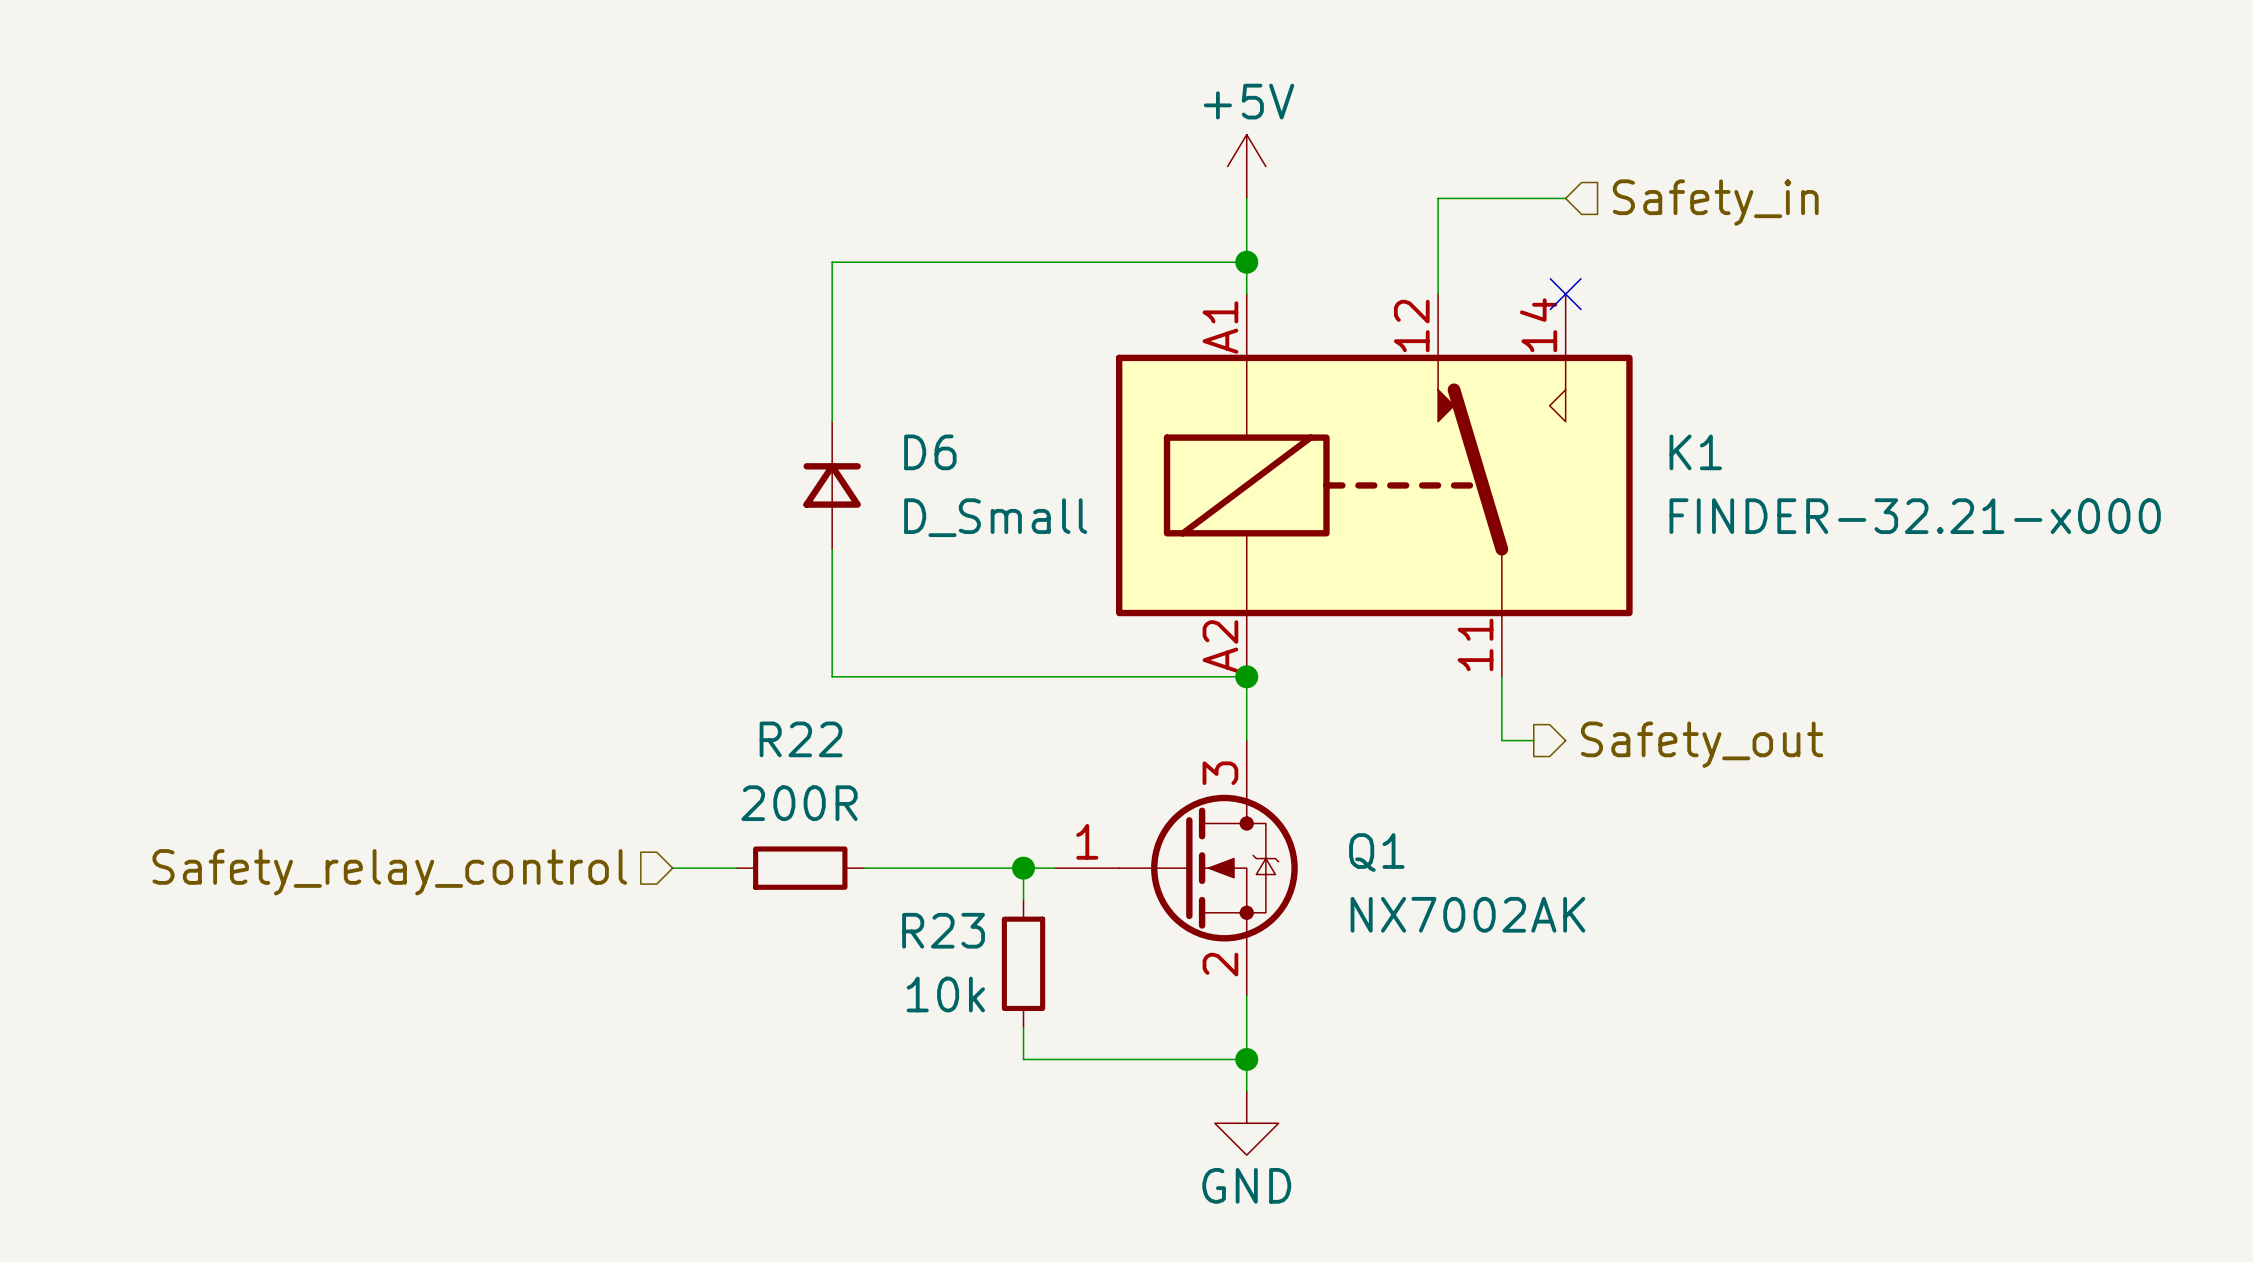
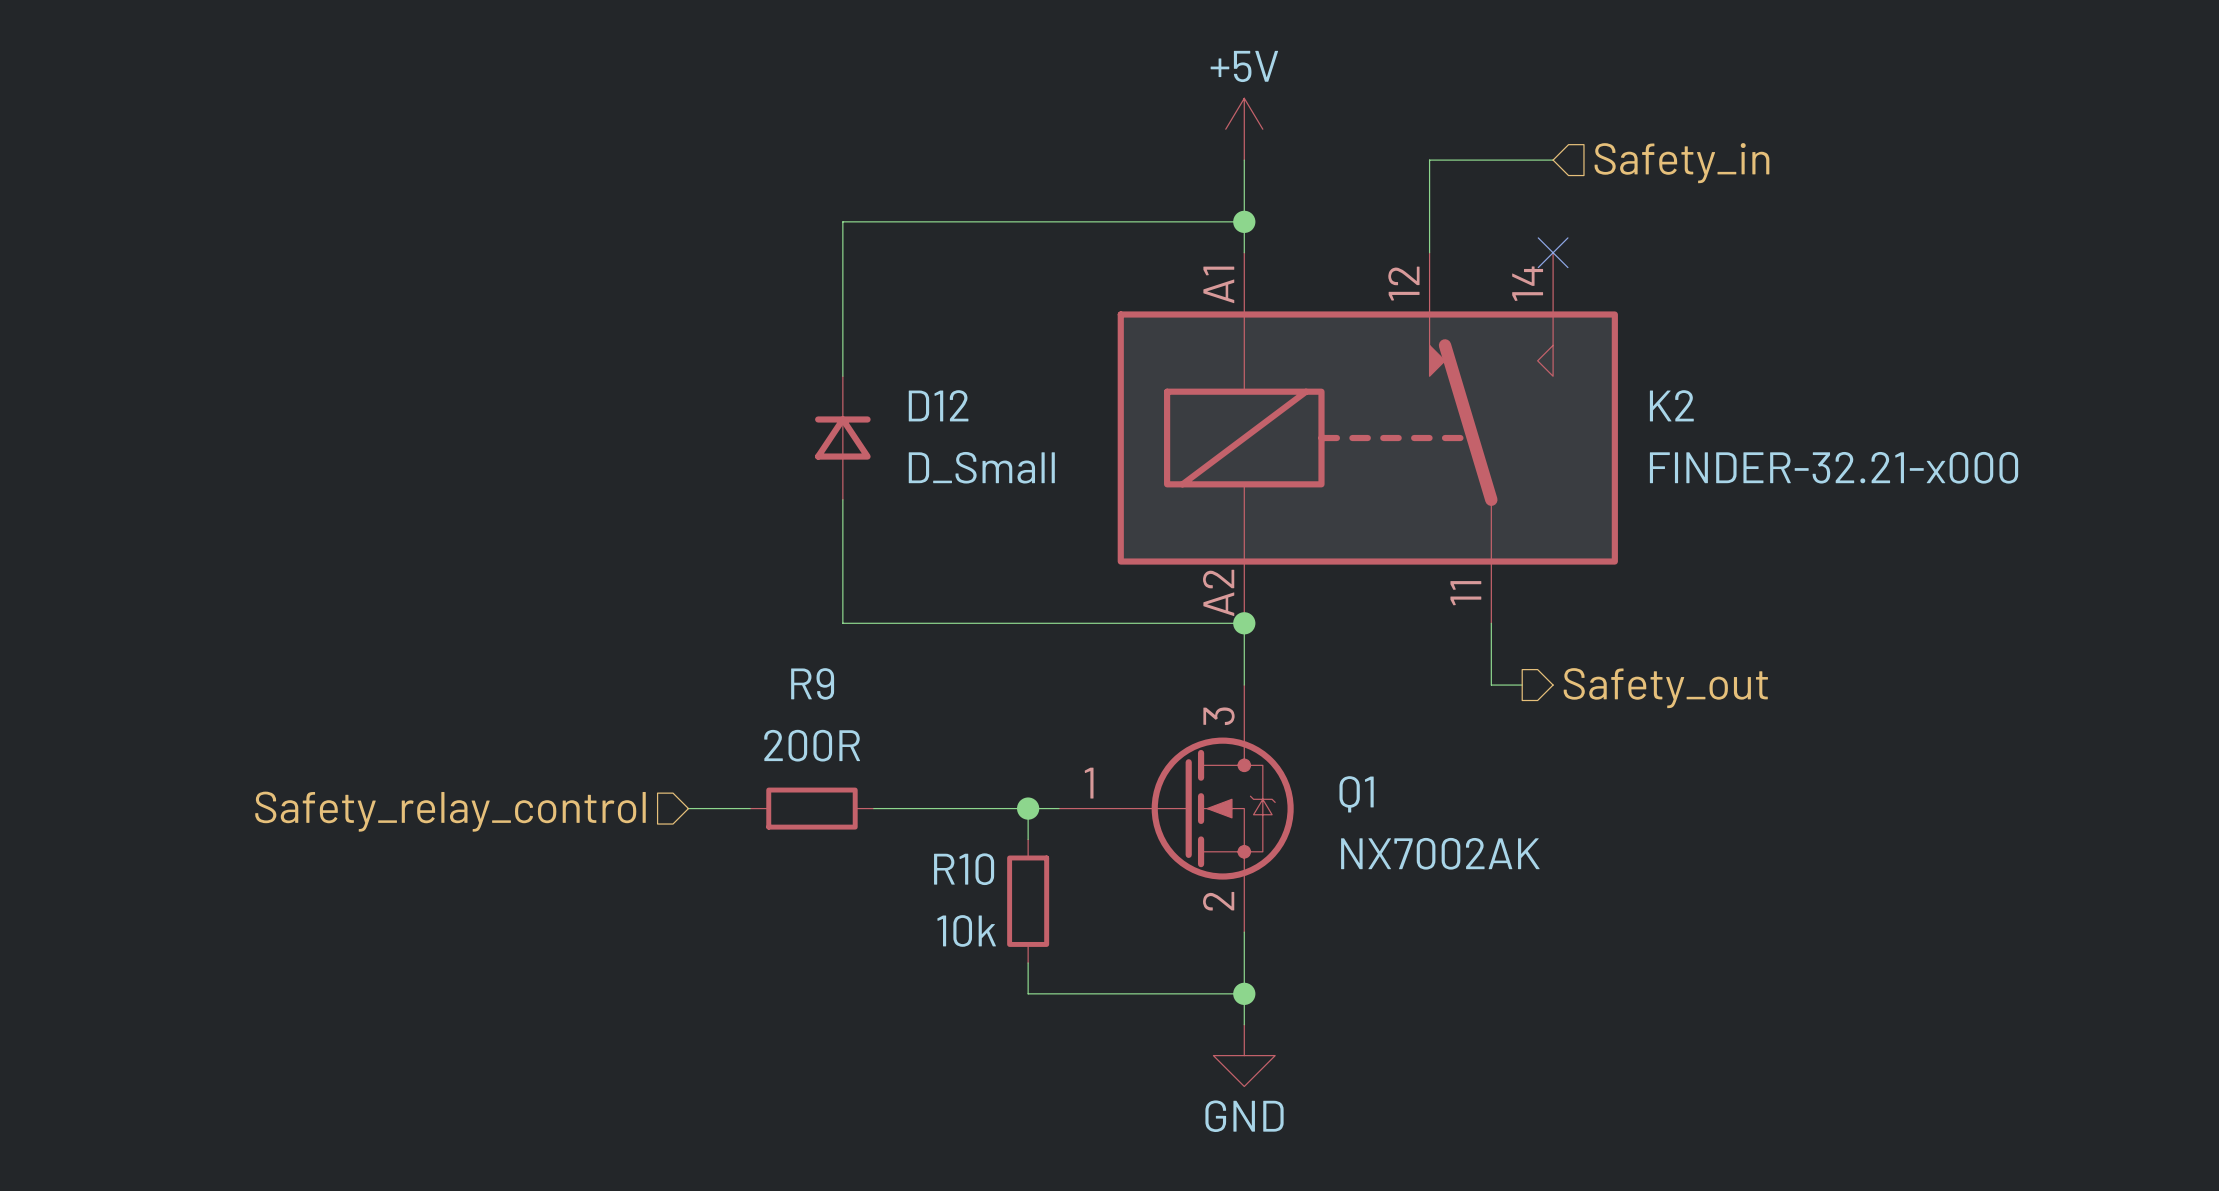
D6 name: D6 (930, 452) -> D12 (938, 405)
K1 name: K1 (1695, 452) -> K2 (1671, 405)
R22 name: R22 (801, 739) -> R9 (812, 683)
R23 name: R23 (943, 930) -> R10 (964, 869)

